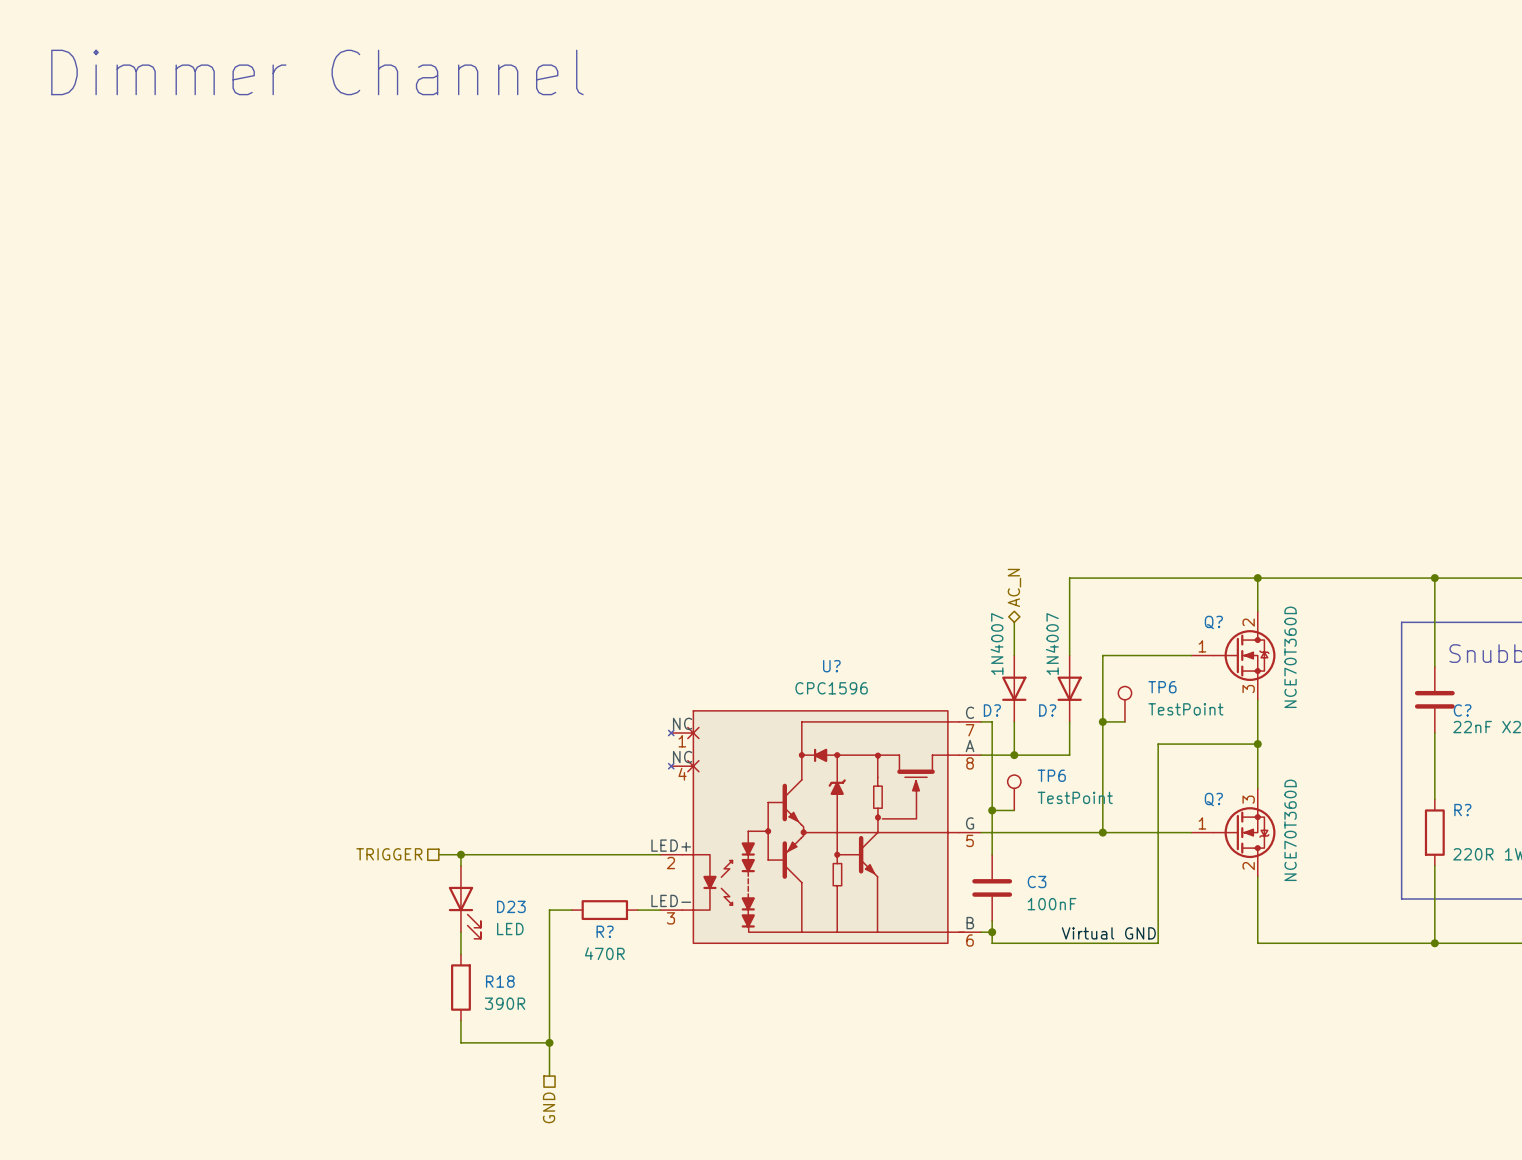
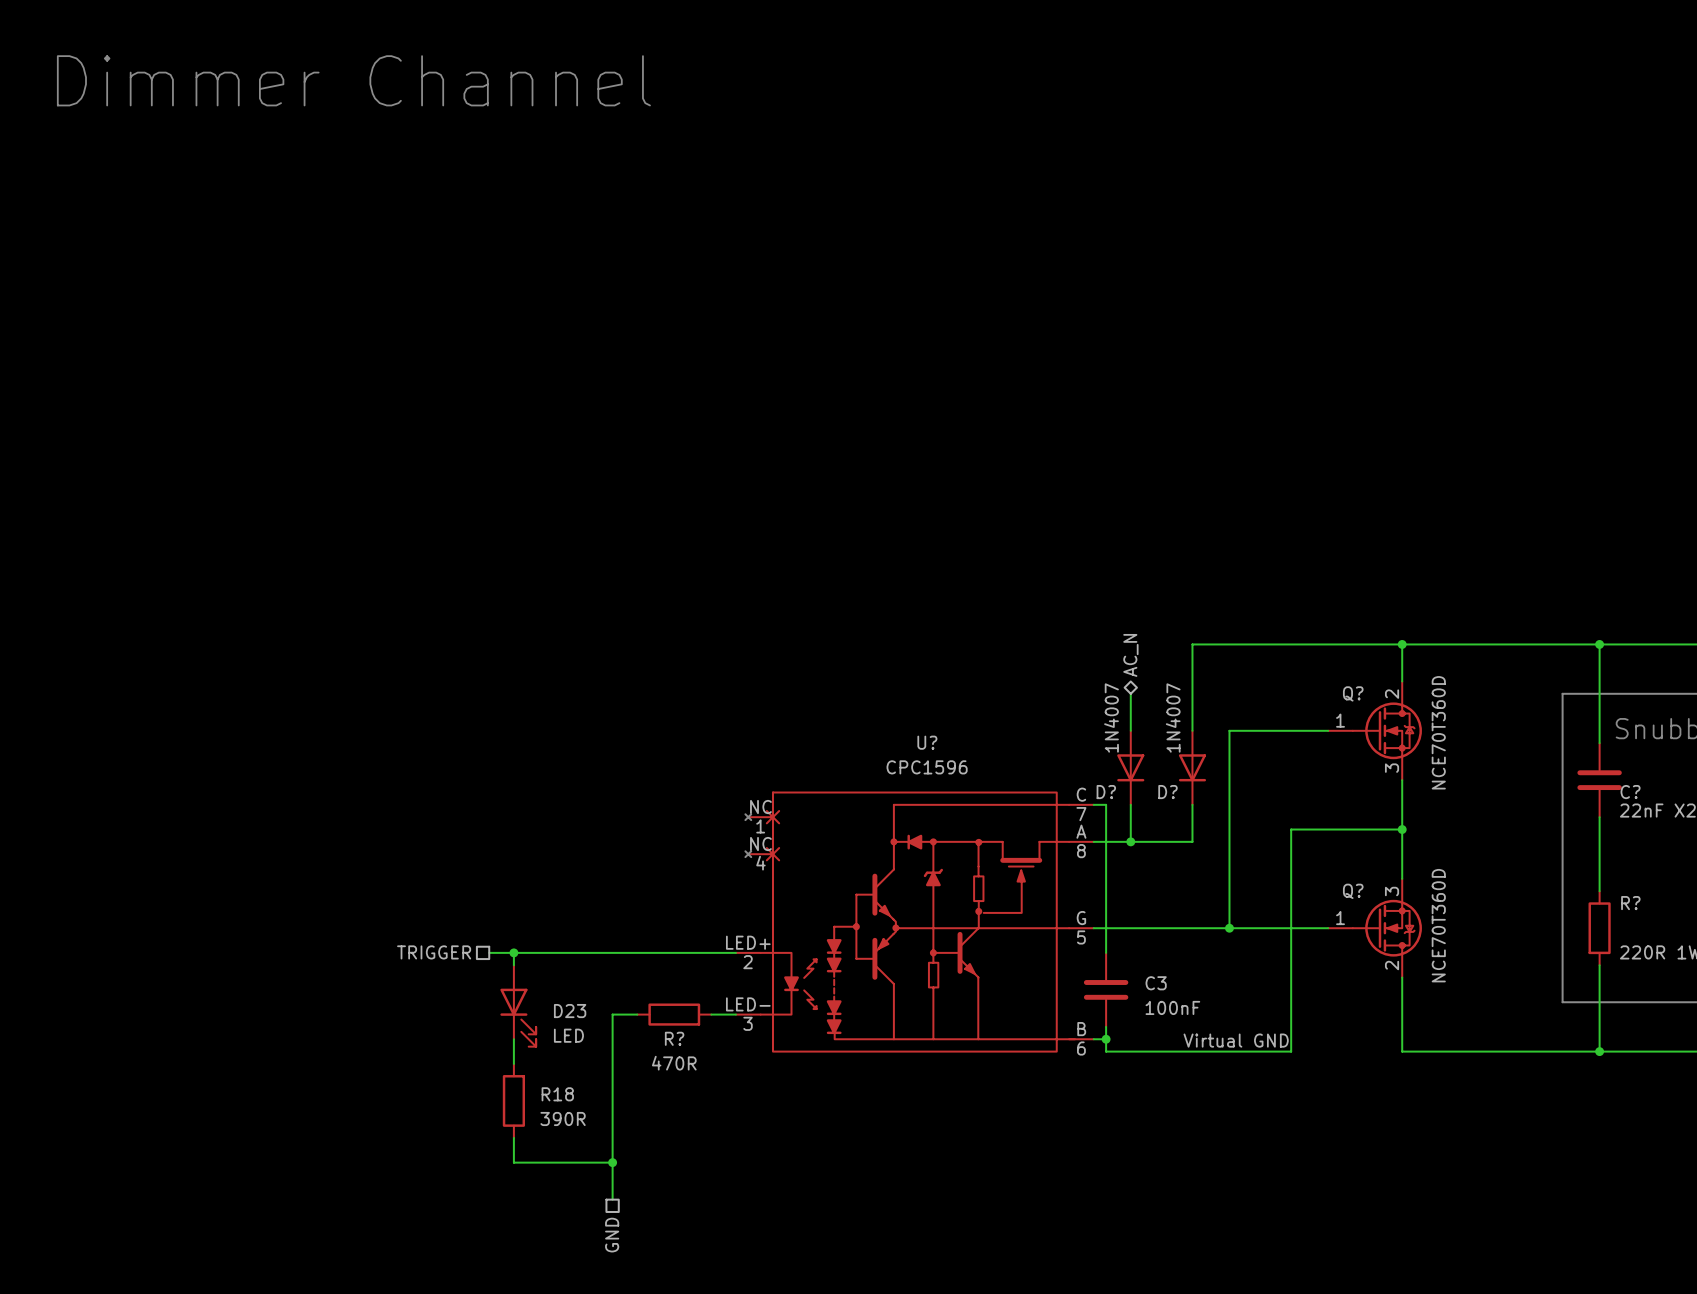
TP6: TestPoint (1124, 704) -> none
wire: (1102, 721) (1124, 721) -> none
junction: (1102, 721) -> none
TP6: TestPoint (1014, 792) -> none
wire: (992, 810) (1014, 810) -> none
junction: (992, 810) -> none

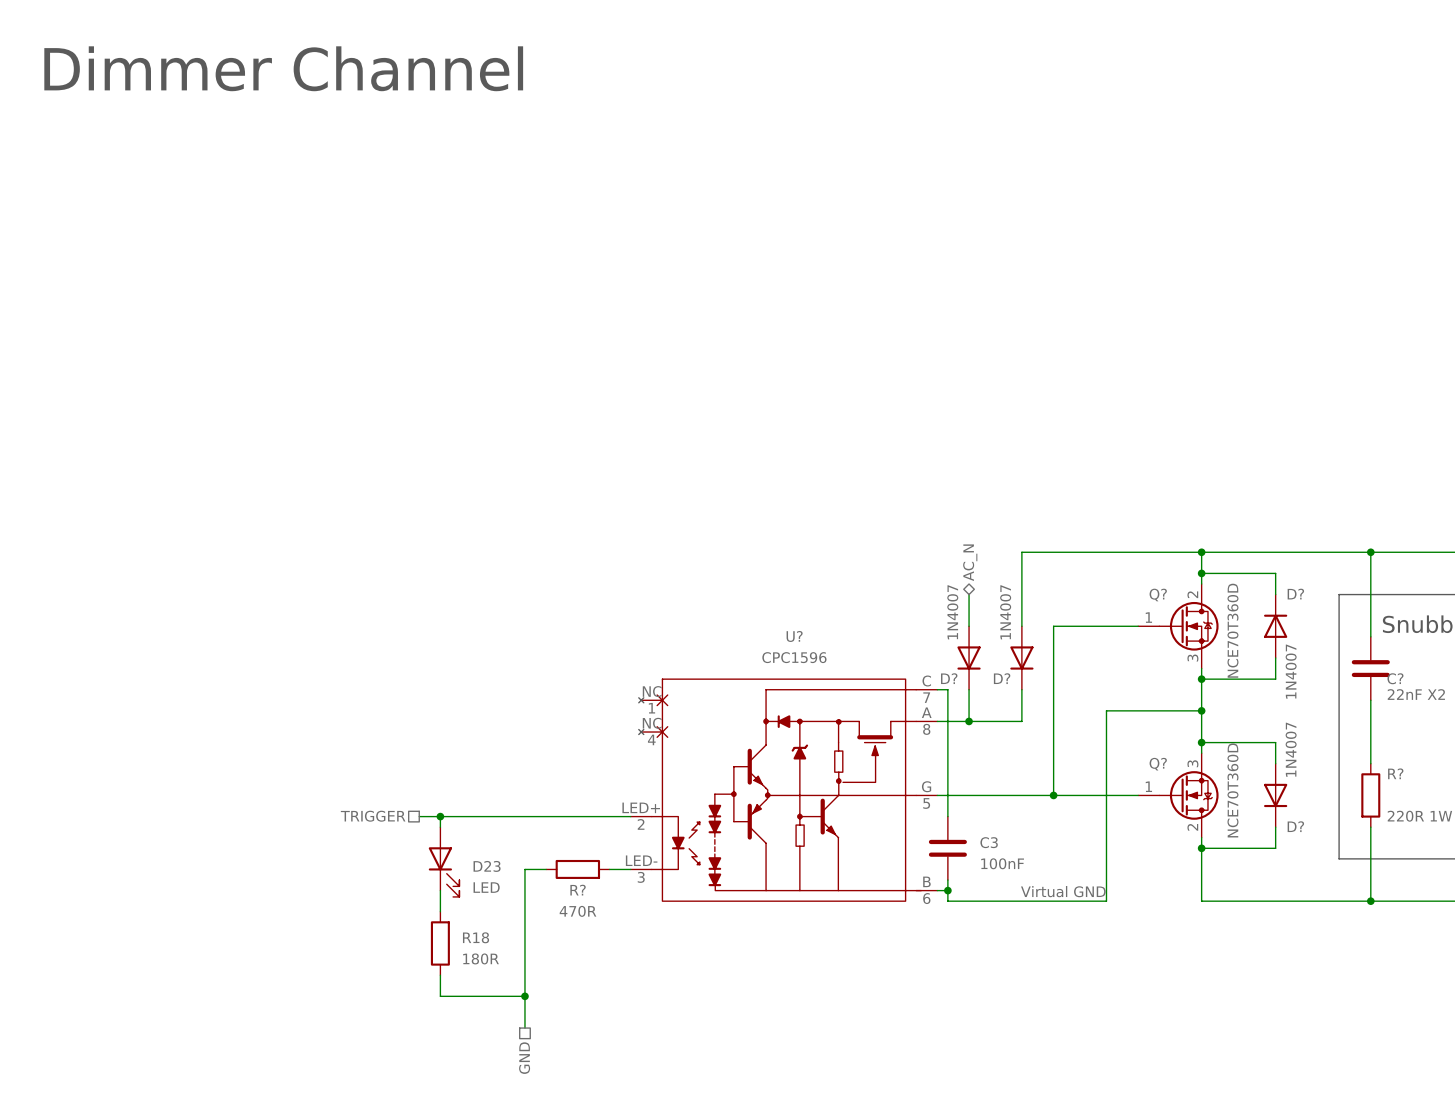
wire: none -> (1201, 573) (1275, 573) (1275, 594)
junction: none -> (1201, 573)
D?: none -> 1N4007 (1275, 626)
wire: none -> (1275, 658) (1275, 679) (1201, 679)
junction: none -> (1201, 679)
wire: none -> (1201, 742) (1275, 742) (1275, 763)
junction: none -> (1201, 742)
D?: none -> 1N4007 (1275, 795)
wire: none -> (1275, 827) (1275, 848) (1201, 848)
junction: none -> (1201, 848)
R18 value: 390R (563, 1118) -> 180R (481, 958)

